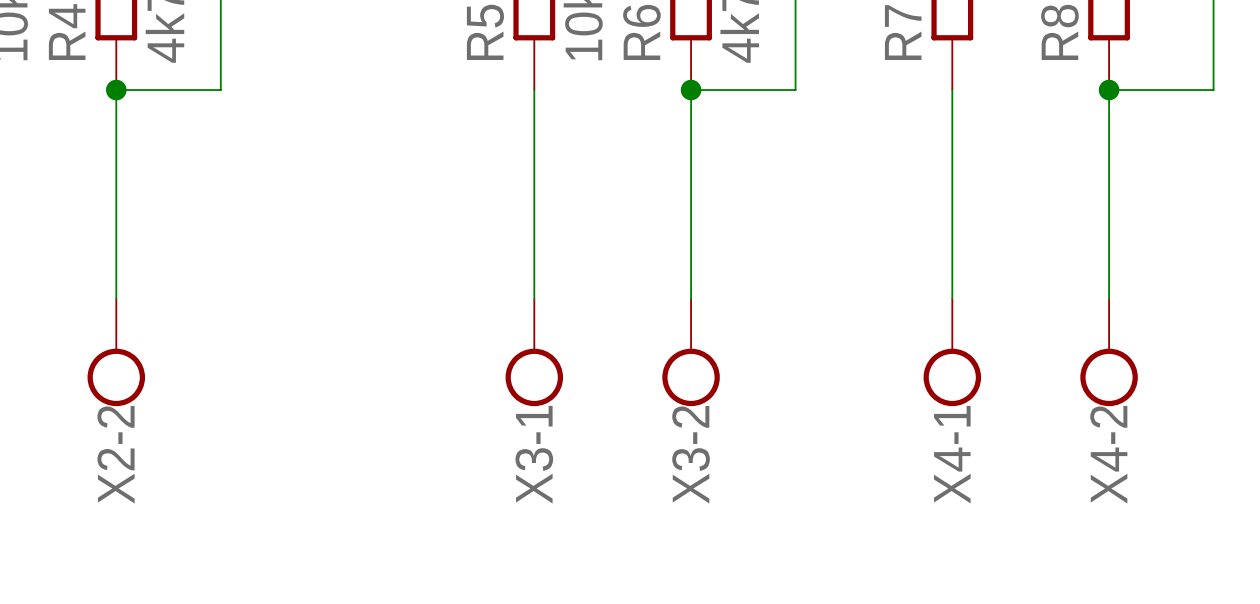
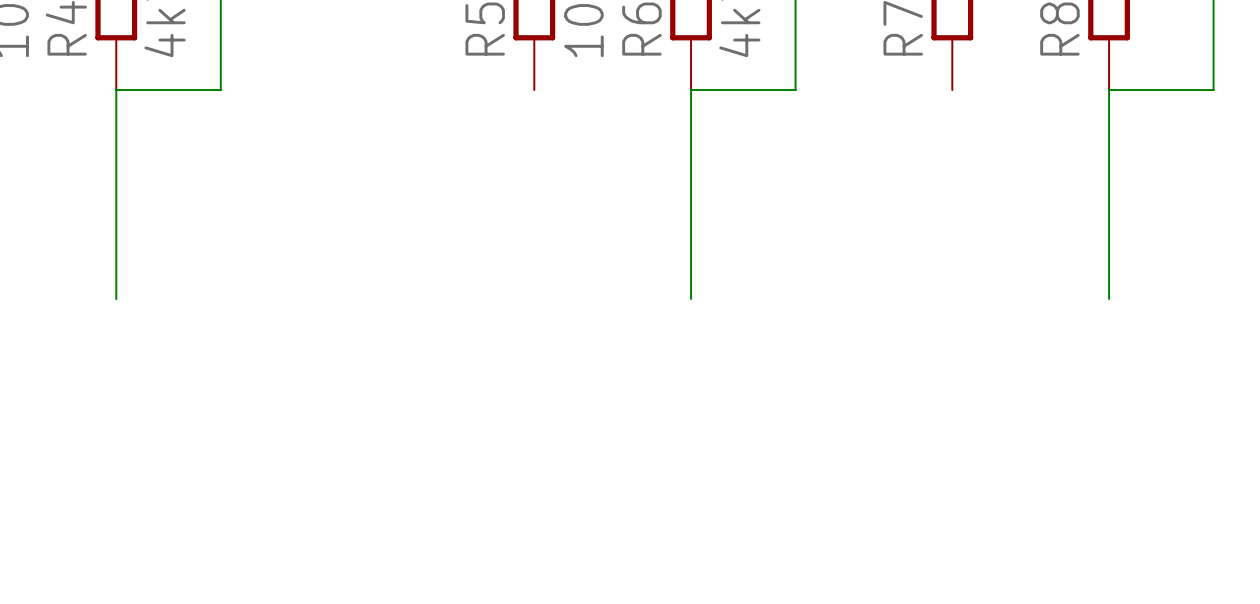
junction: (116, 90) -> none
wire: (534, 90) (534, 299) -> none
junction: (691, 90) -> none
wire: (952, 90) (952, 299) -> none
junction: (1109, 90) -> none
X2-2: (116, 352) -> none
X3-1: (534, 352) -> none
X3-2: (691, 352) -> none
X4-1: (952, 352) -> none
X4-2: (1109, 352) -> none

